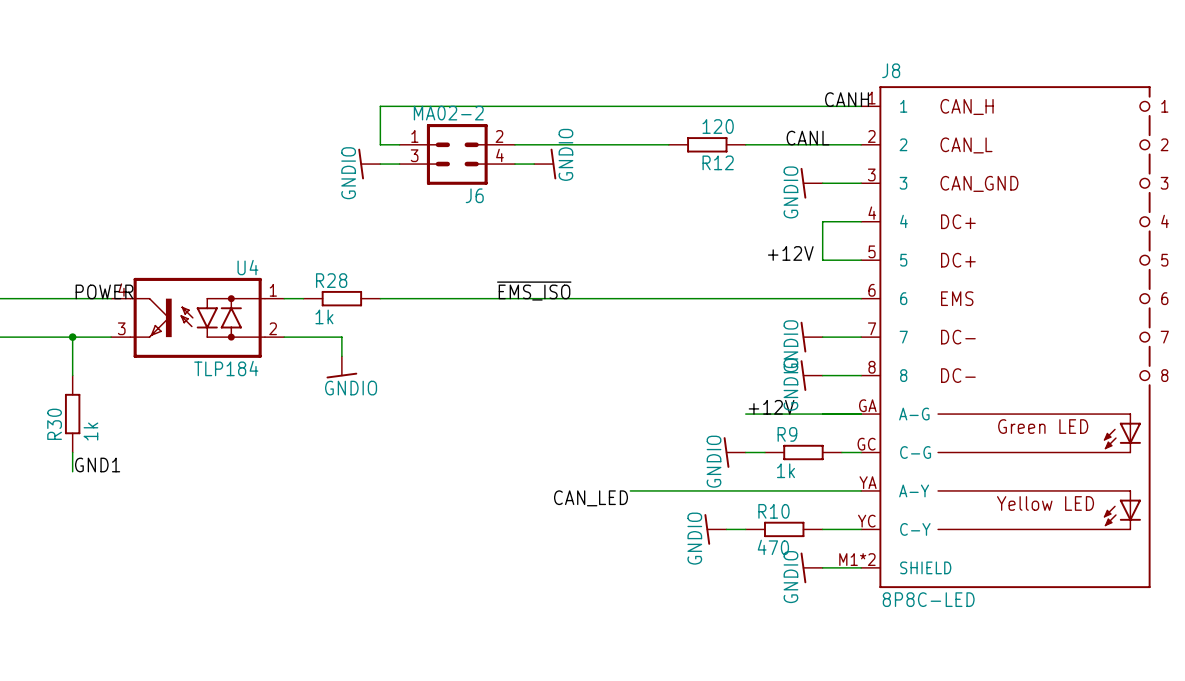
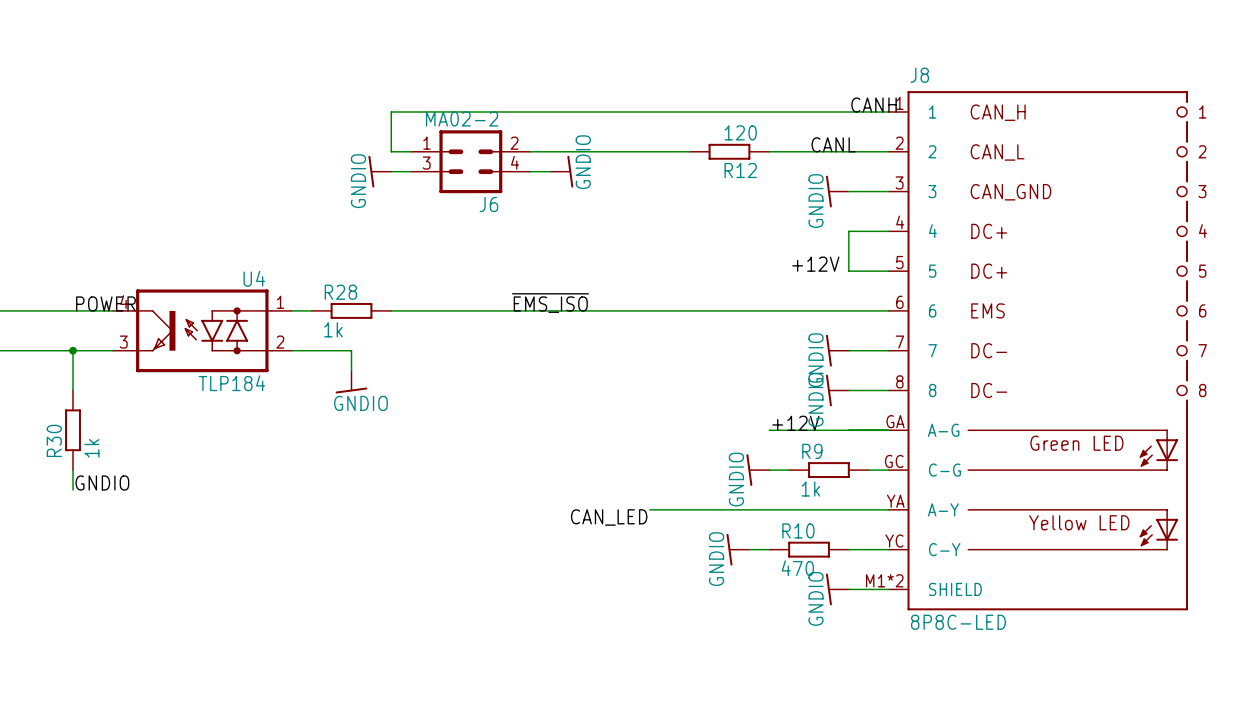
label: GND1 (97, 465) -> GNDIO (102, 483)

